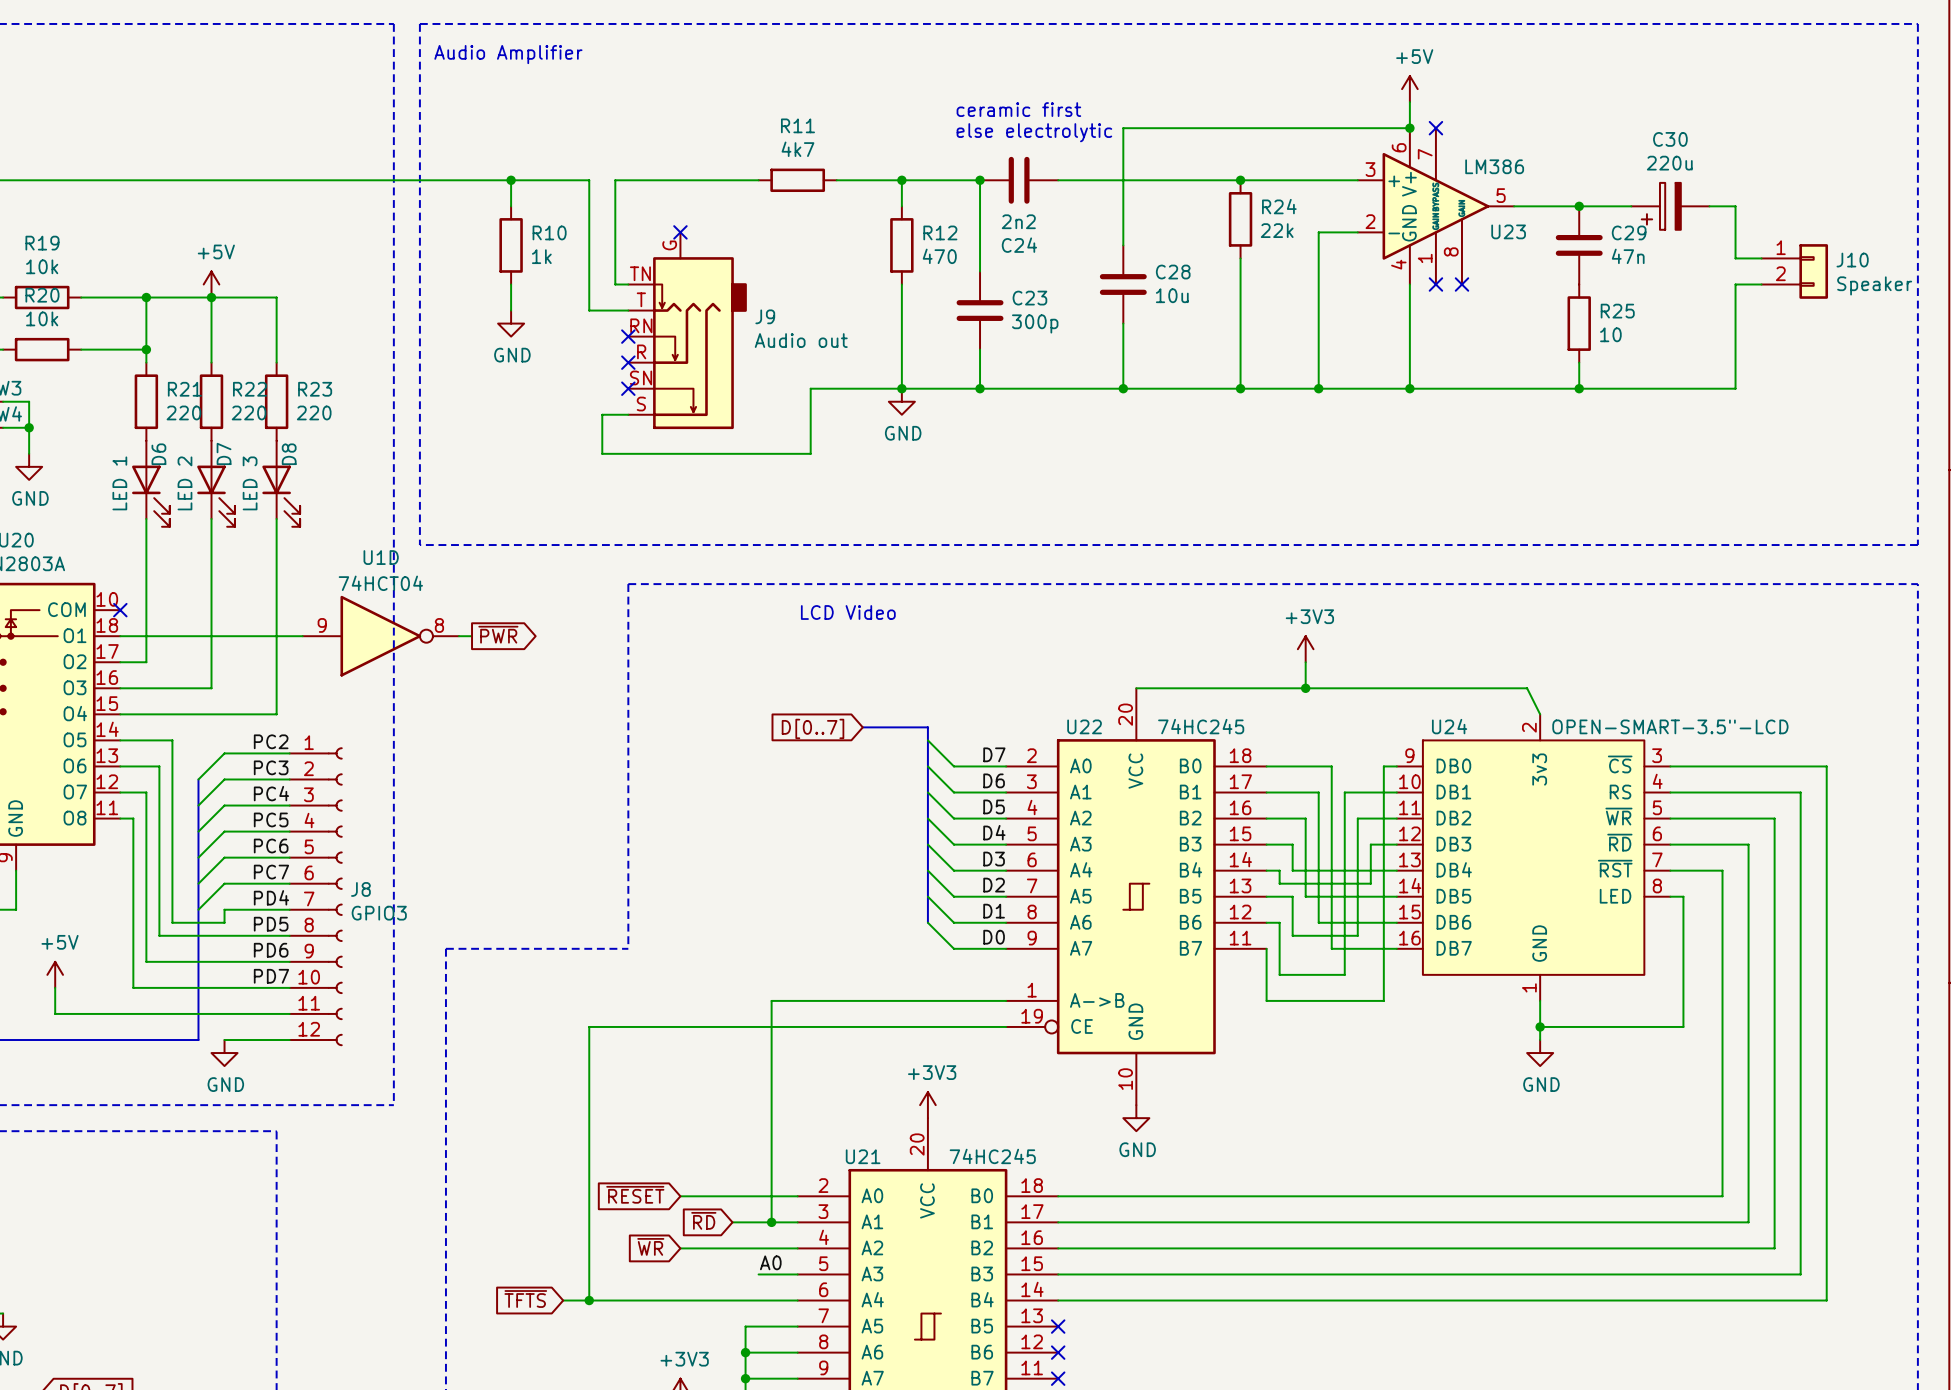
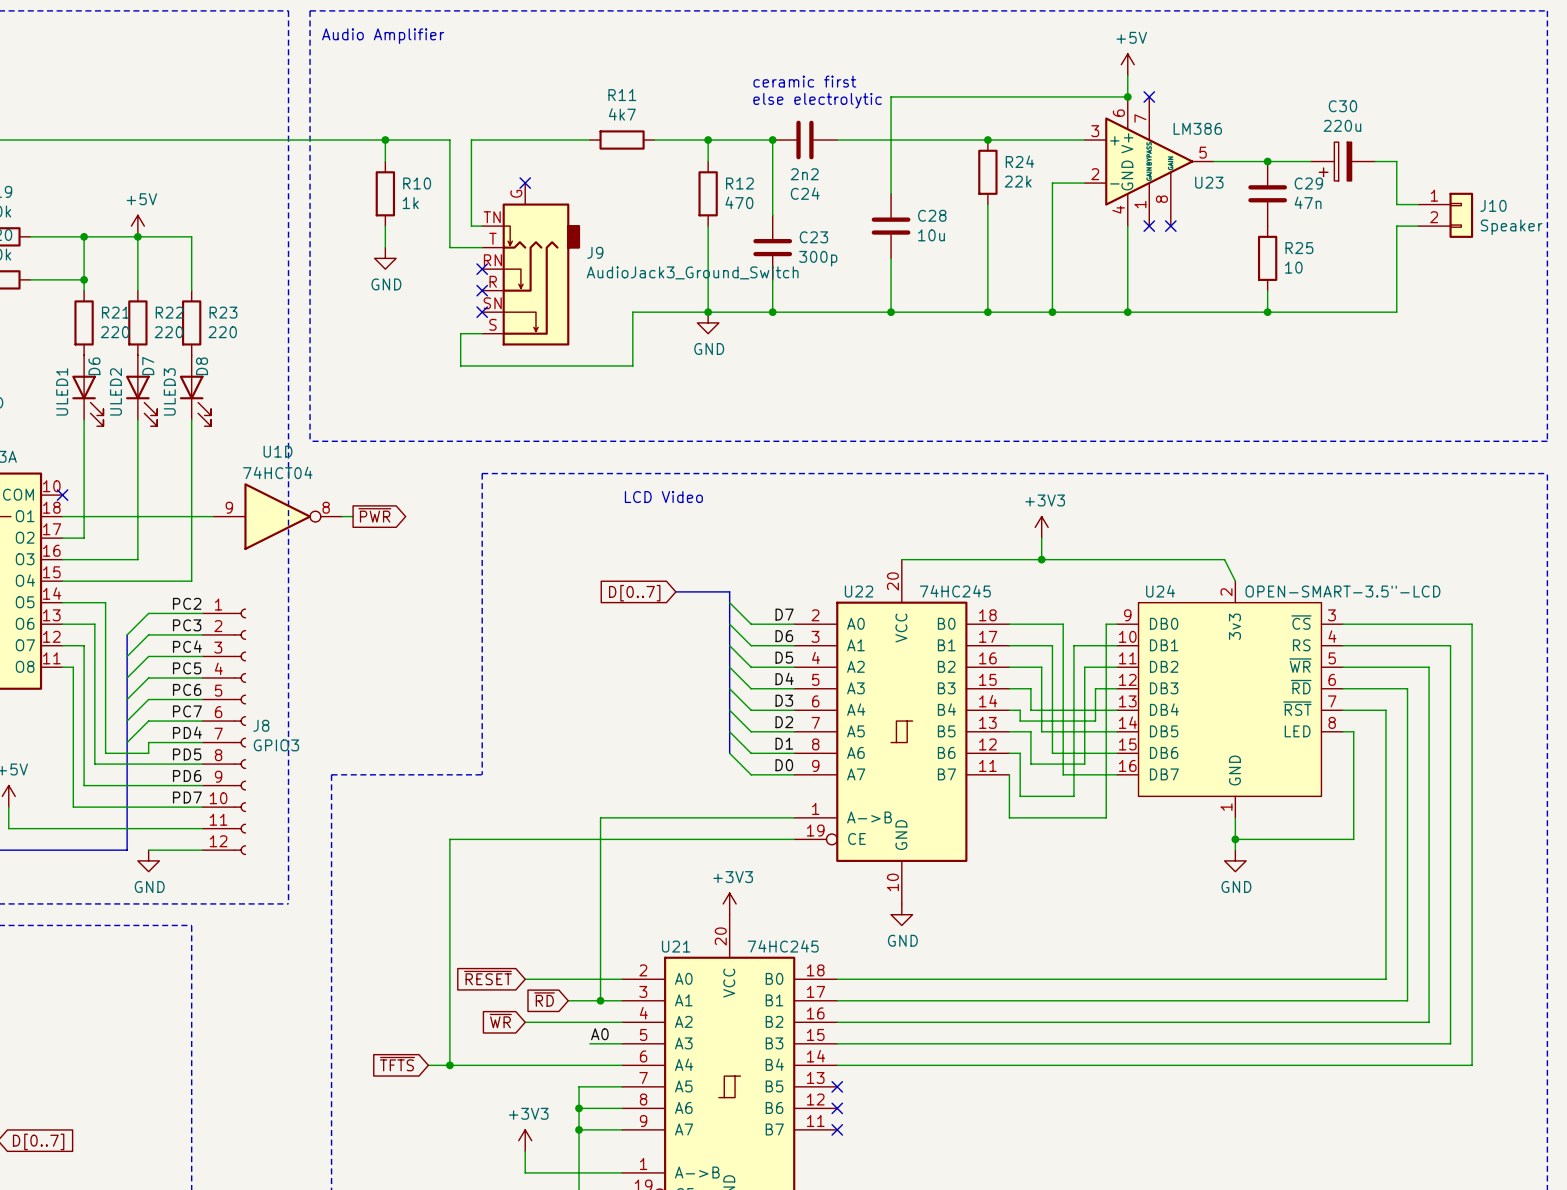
J9 value: Audio out (801, 340) -> AudioJack3_Ground_Switch (692, 272)
D6 value: LED 1 (119, 483) -> ULED1 (62, 391)
D7 value: LED 2 (184, 483) -> ULED2 (115, 391)
D8 value: LED 3 (250, 483) -> ULED3 (169, 391)

